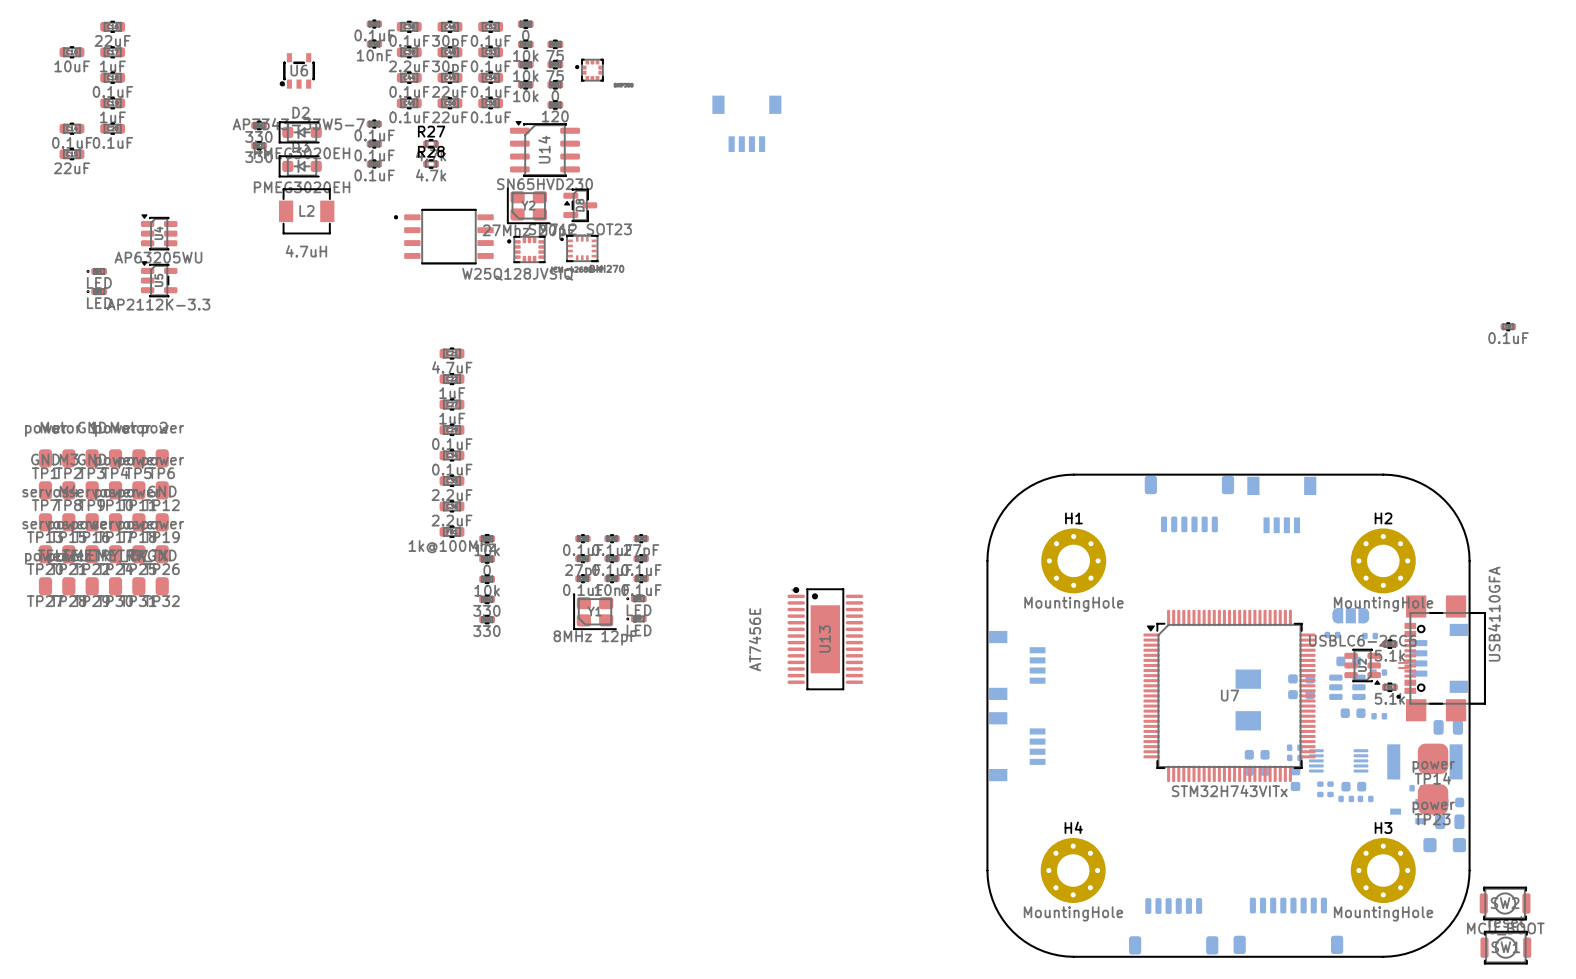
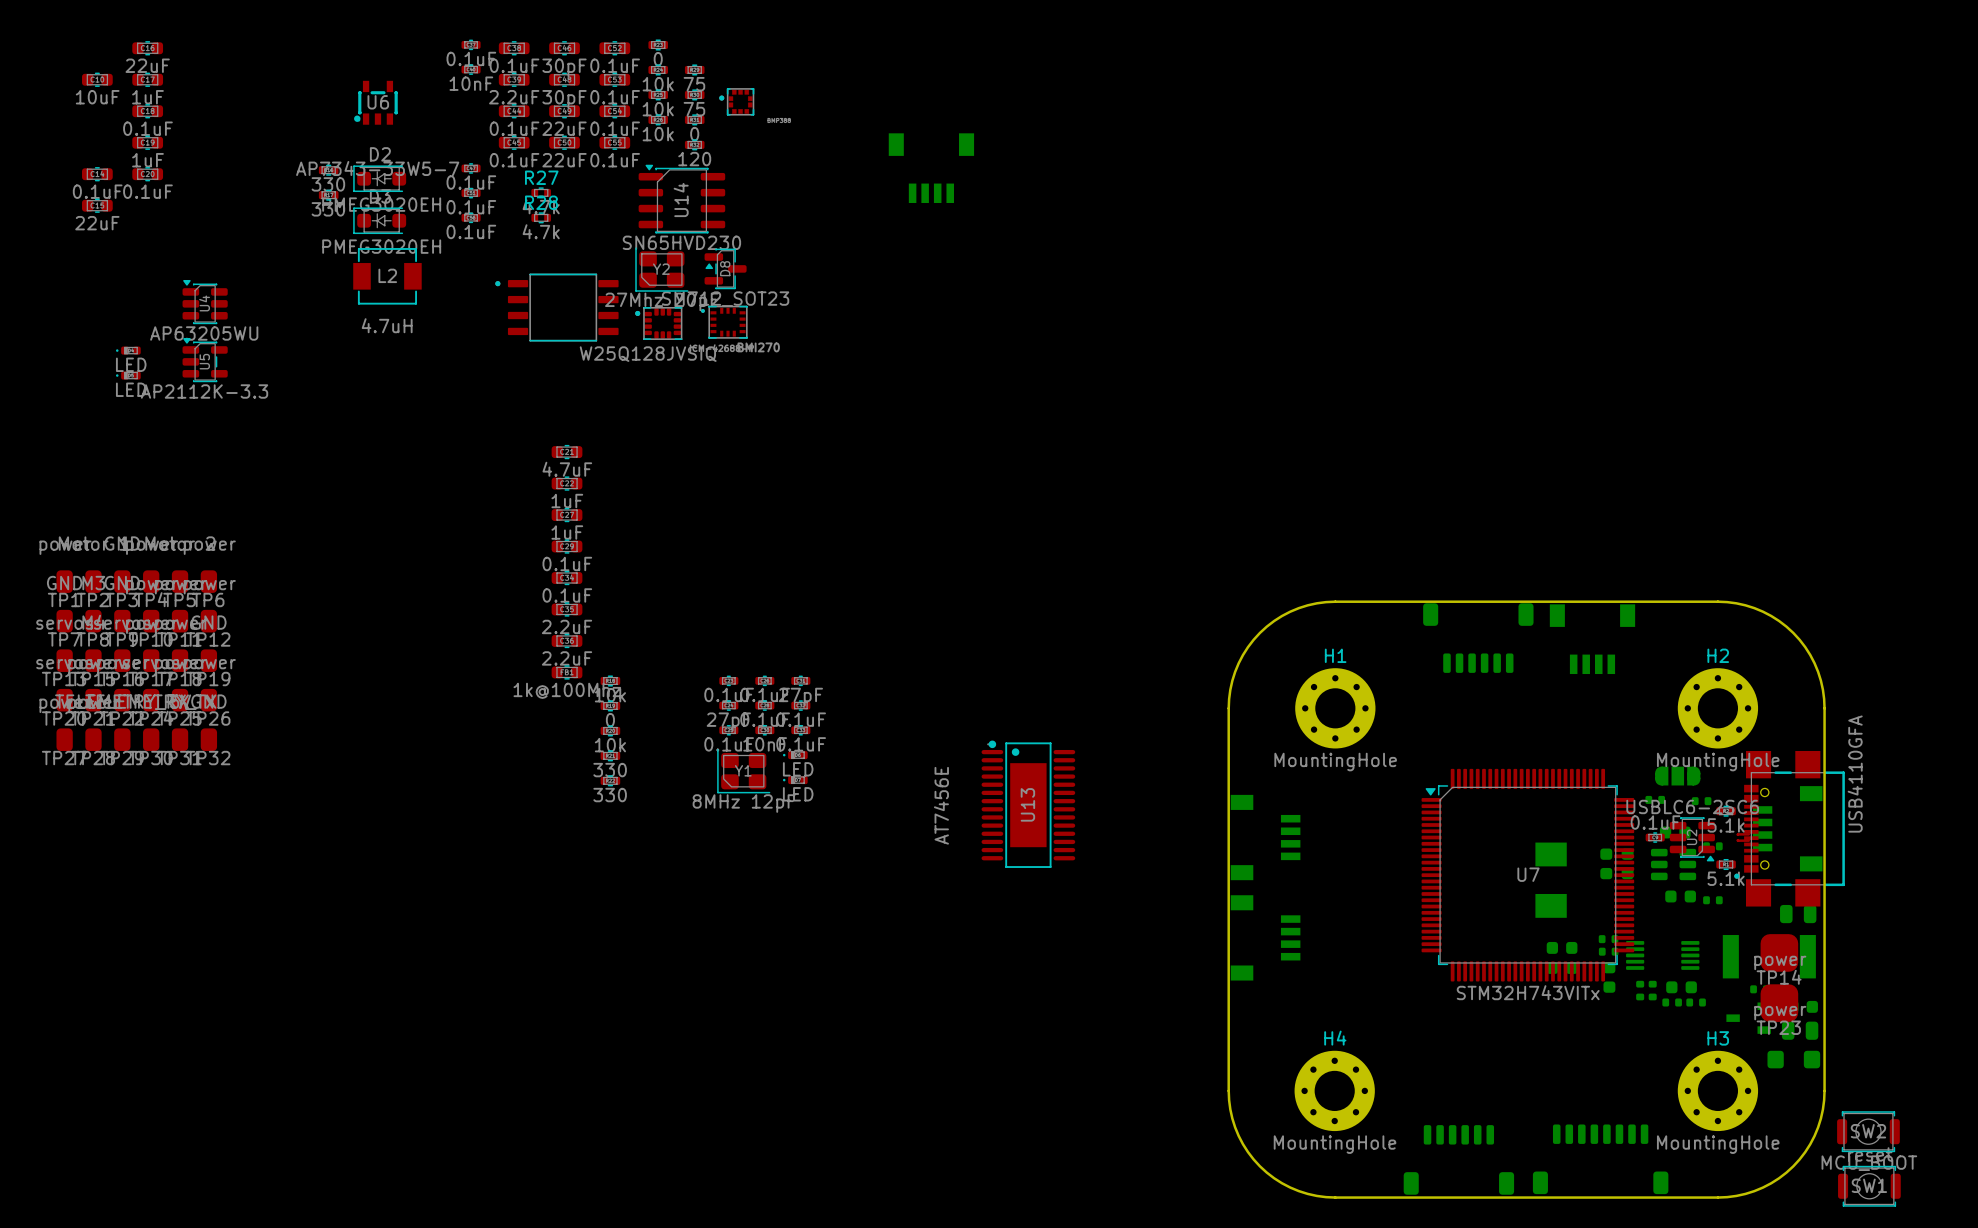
part position: (1508, 326) -> (1655, 837)
part value position: 0.1uF (1508, 338) -> 0.1uF (1655, 822)

